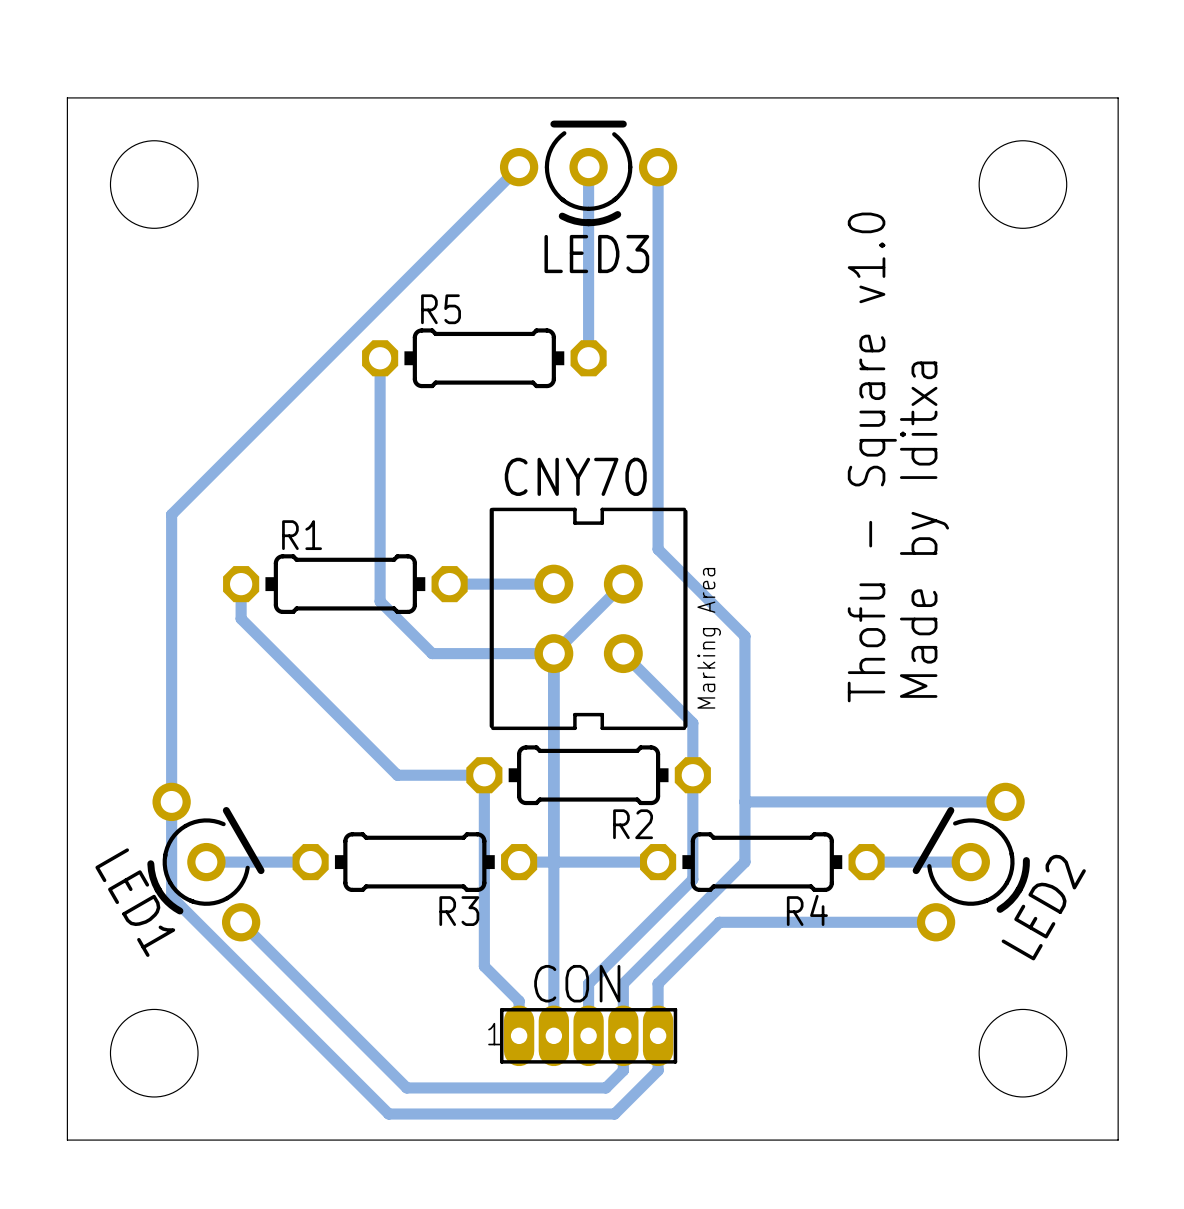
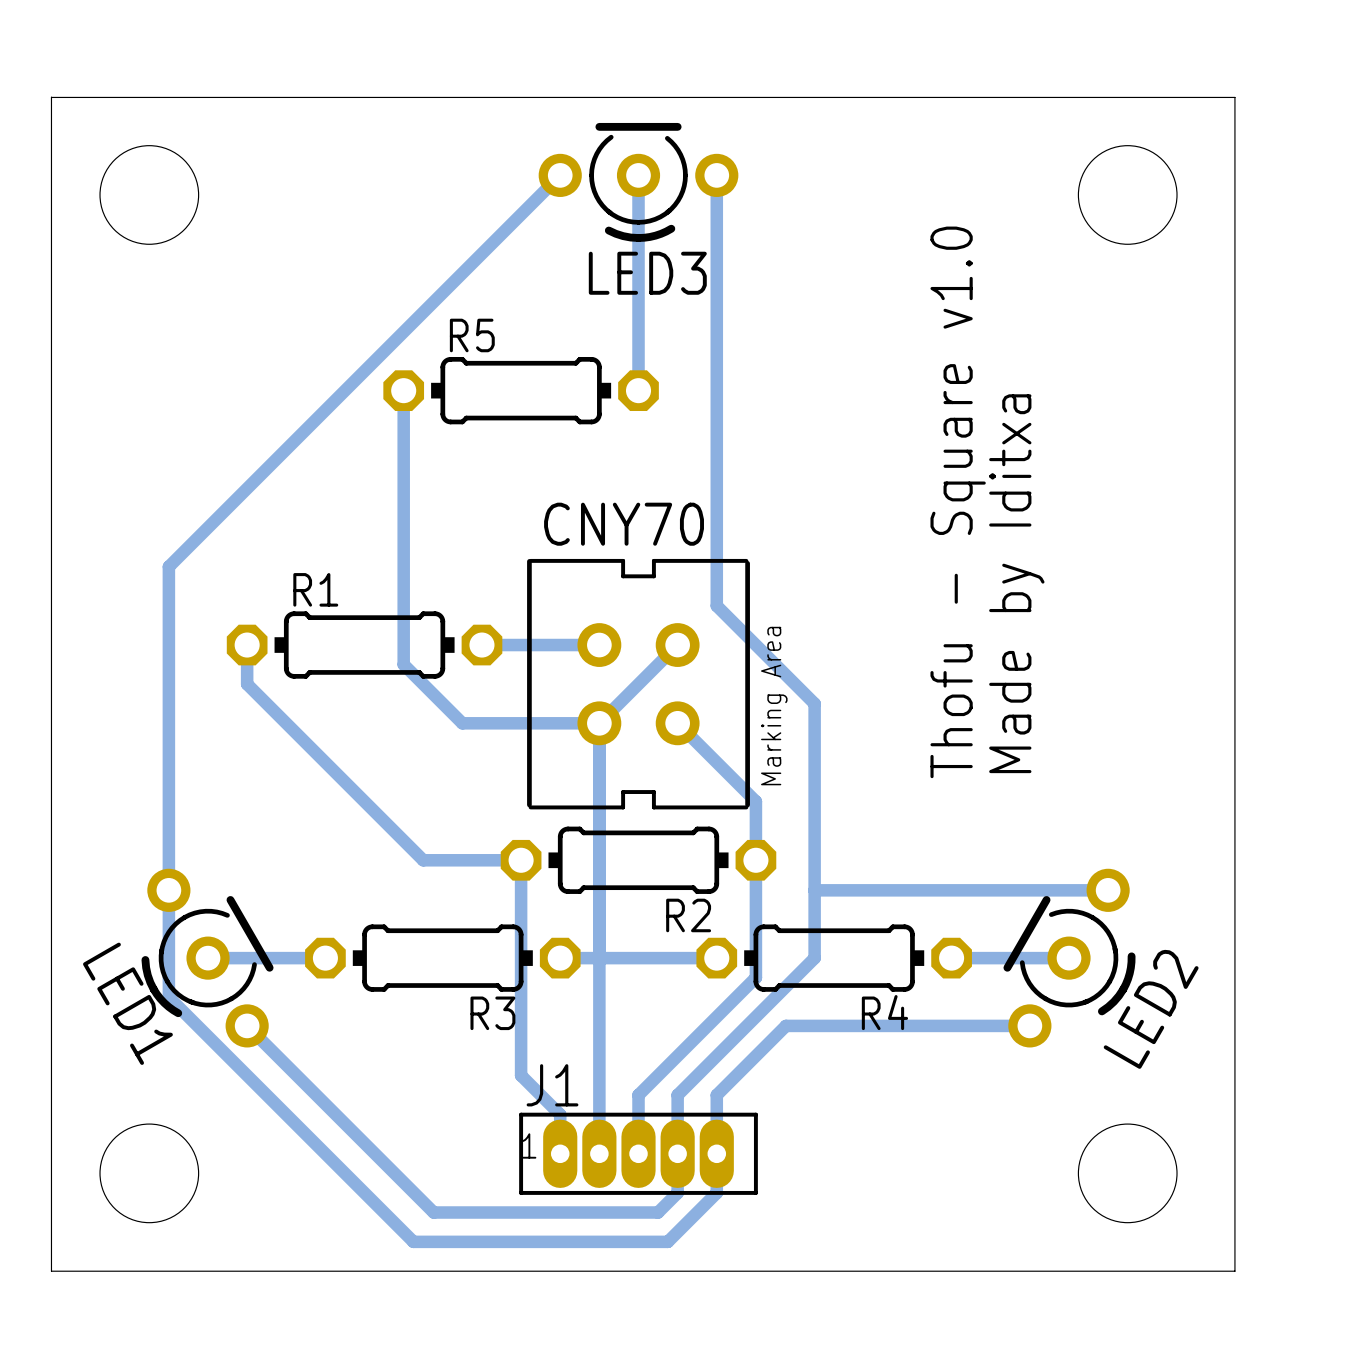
CON: (588, 1035) -> none
J1: none -> (638, 1153)

